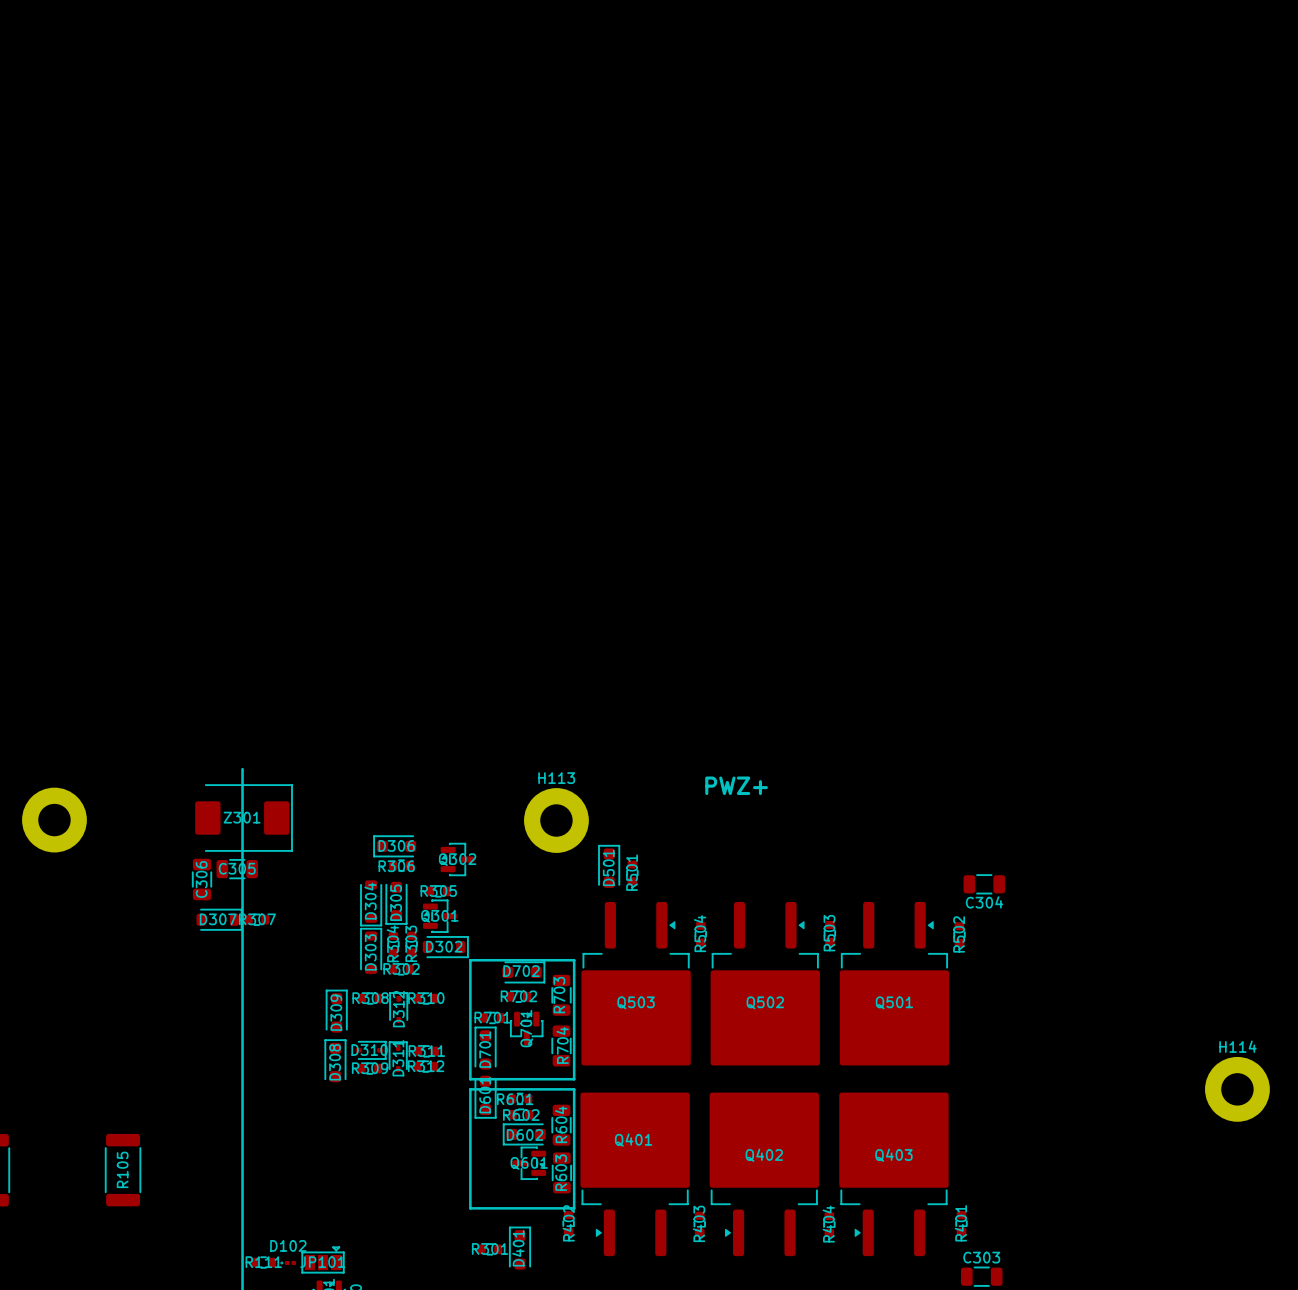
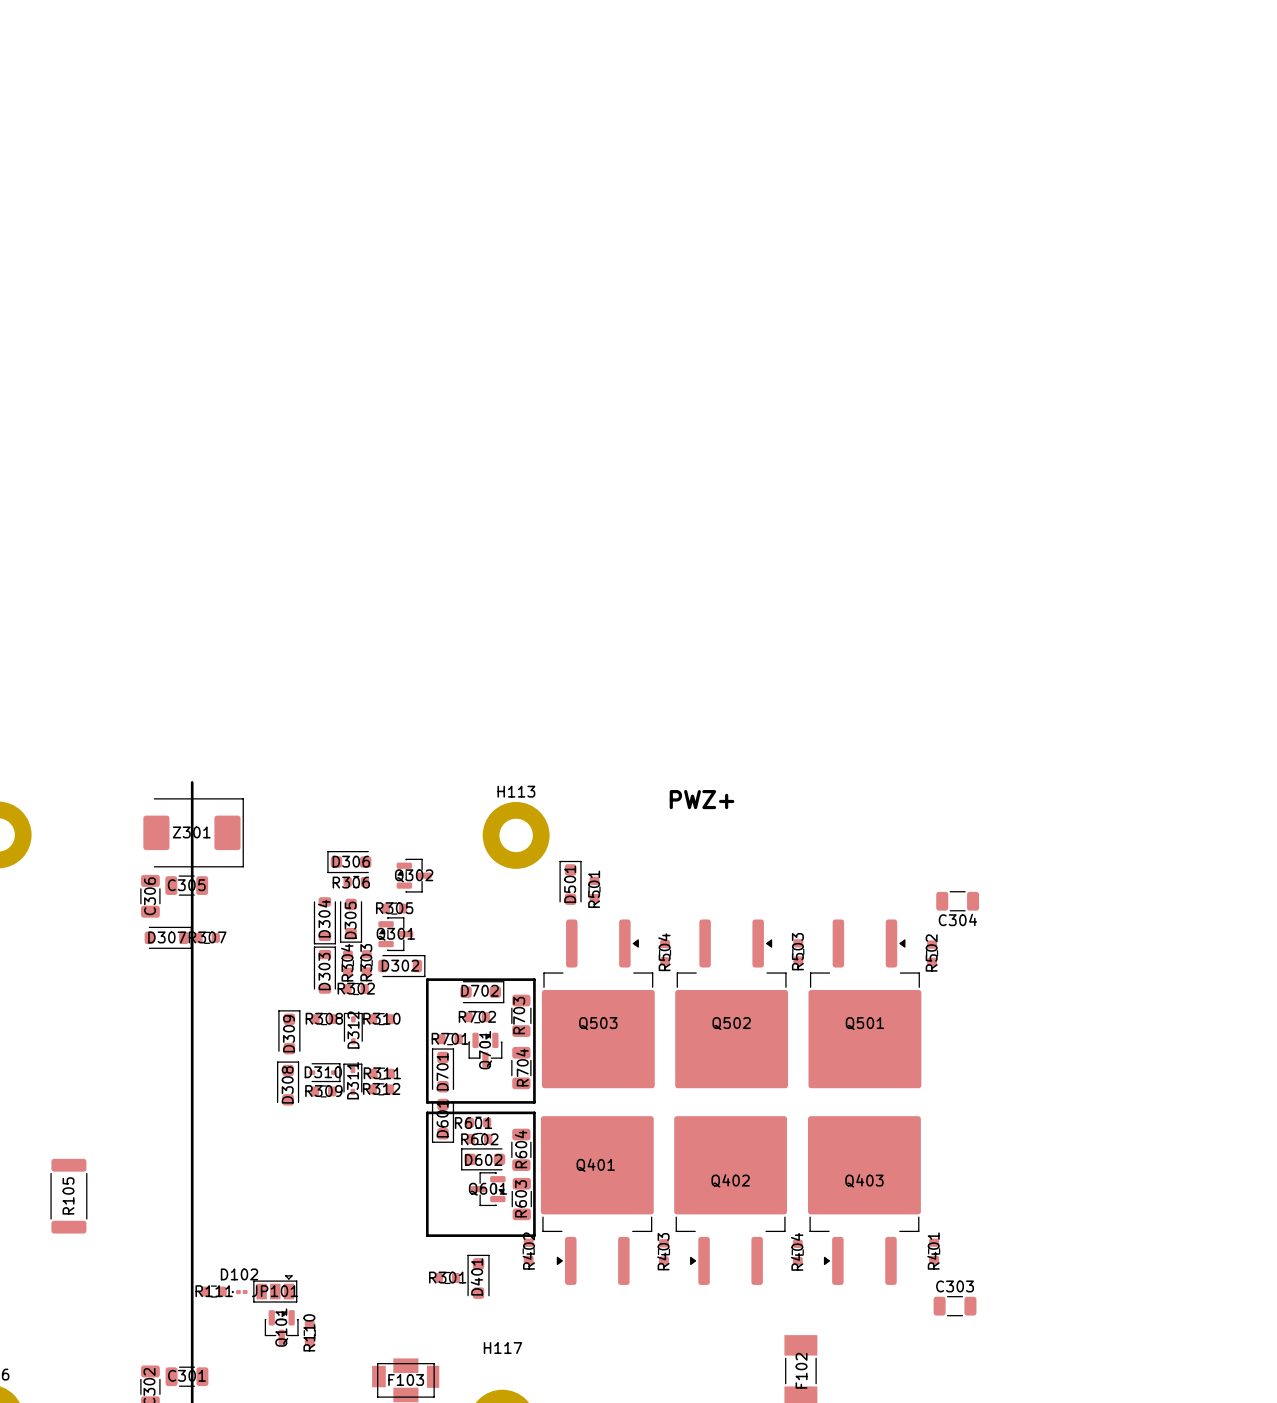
H114: (1237, 1089) -> none

